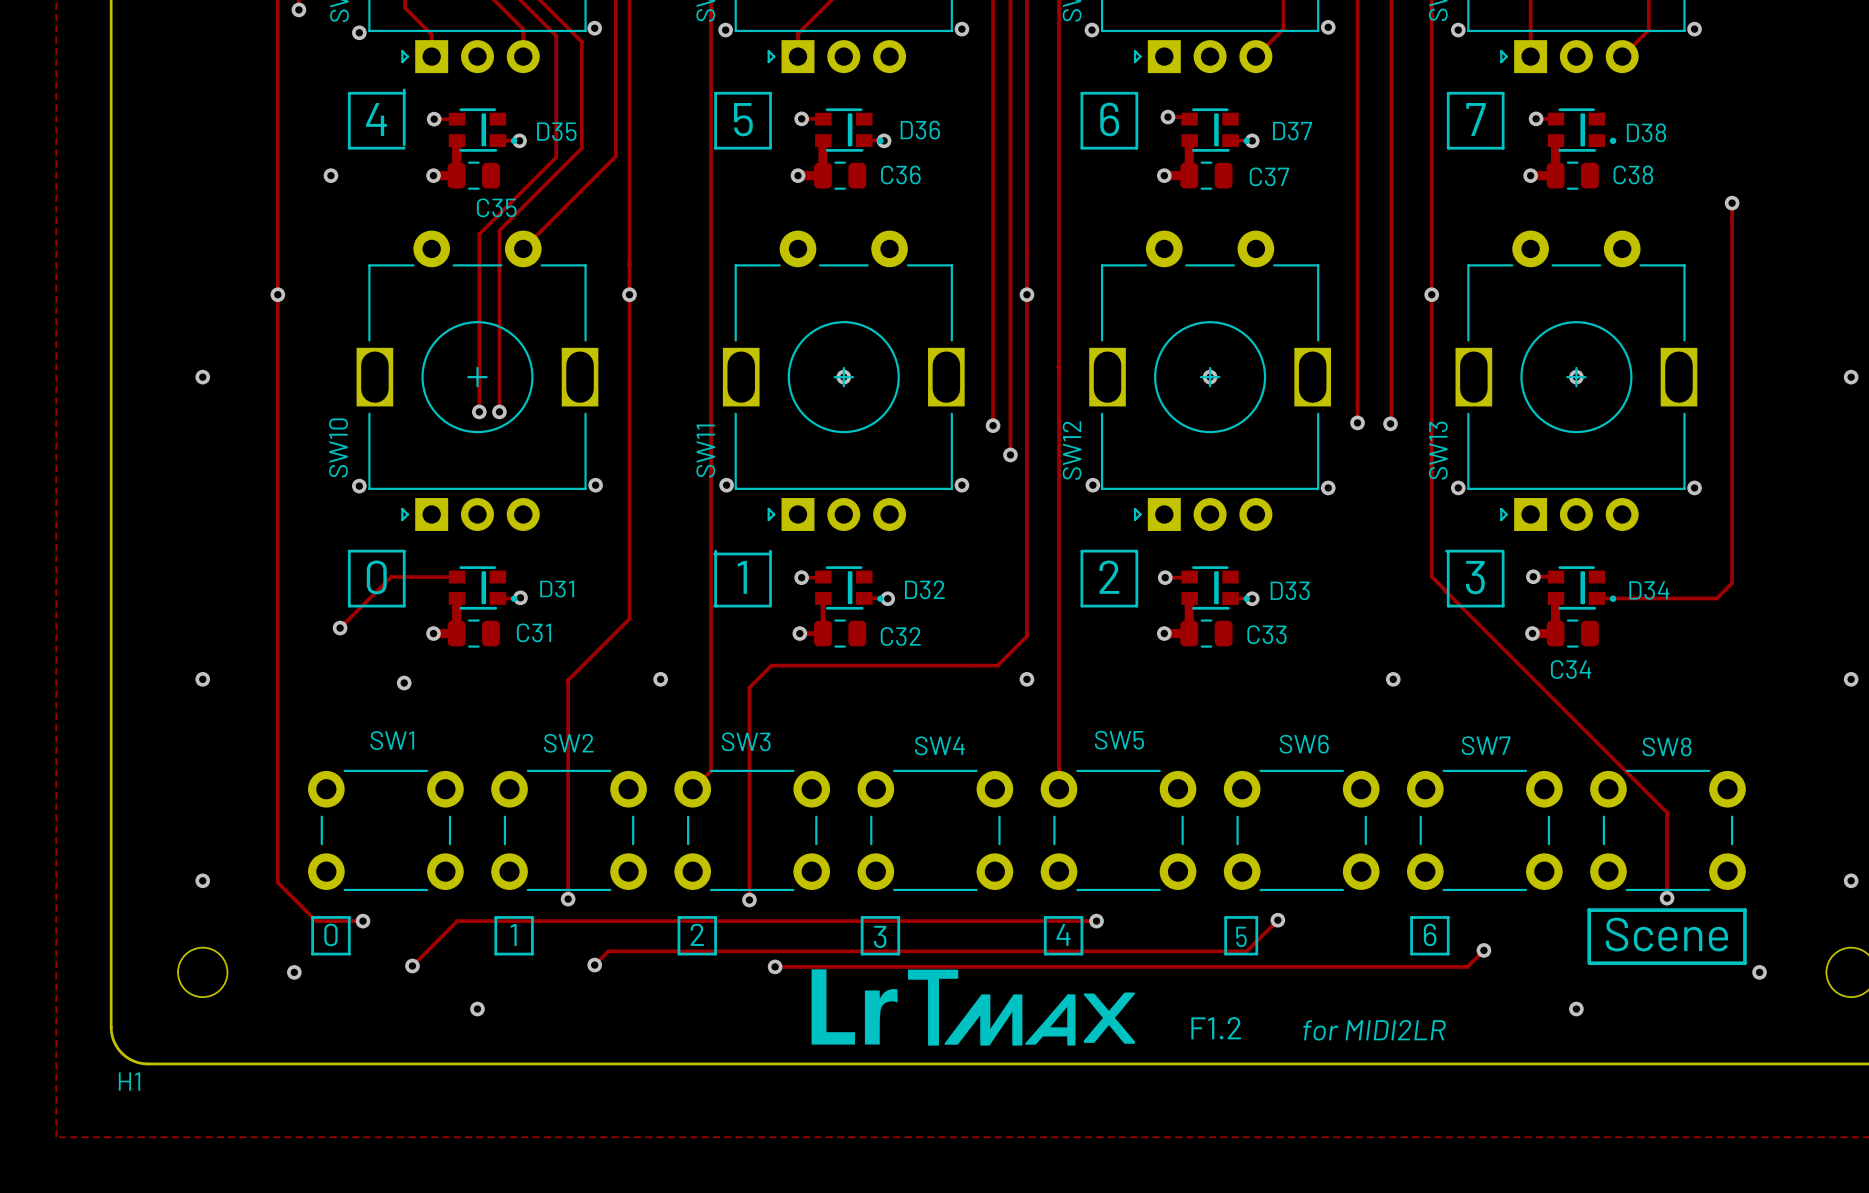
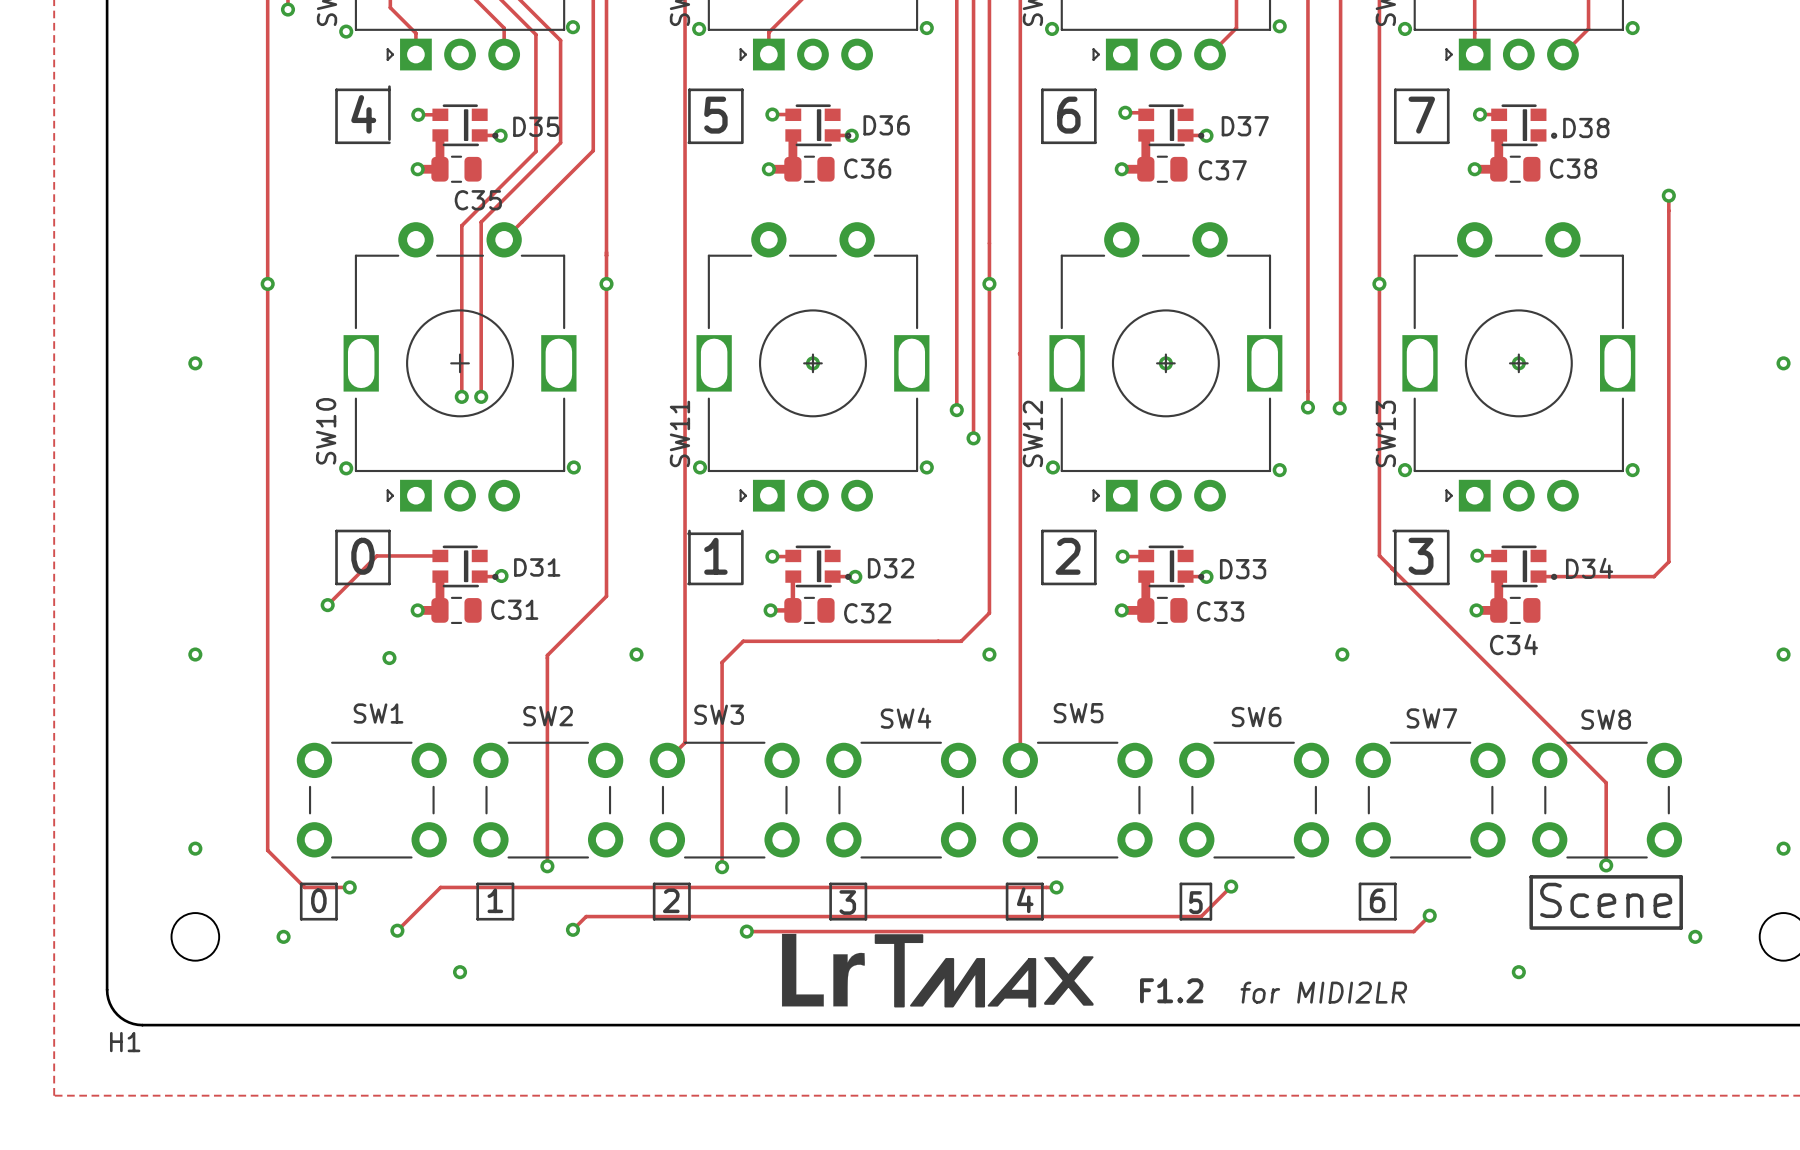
via: (330, 175) -> none

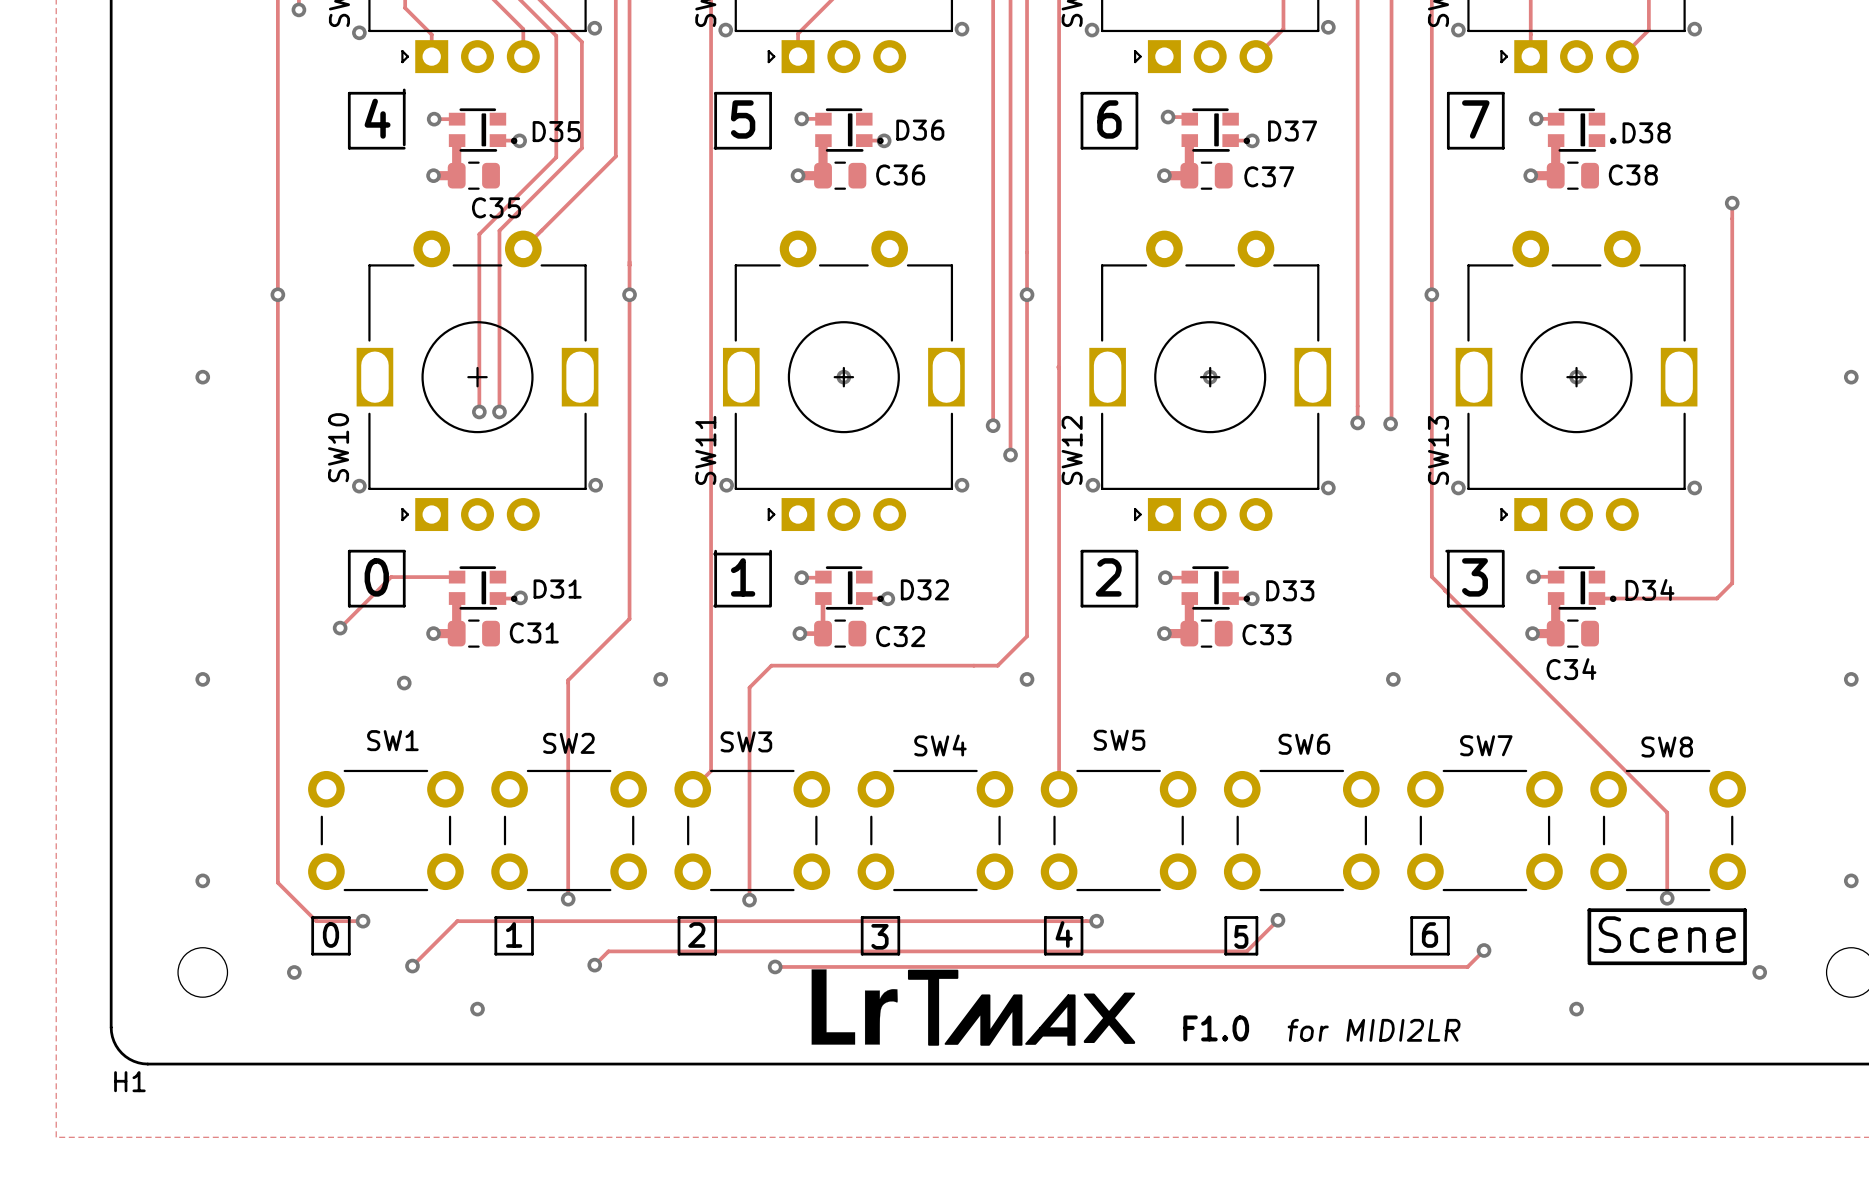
text: F1.2 (1171, 990) -> F1.0 (1216, 1028)

